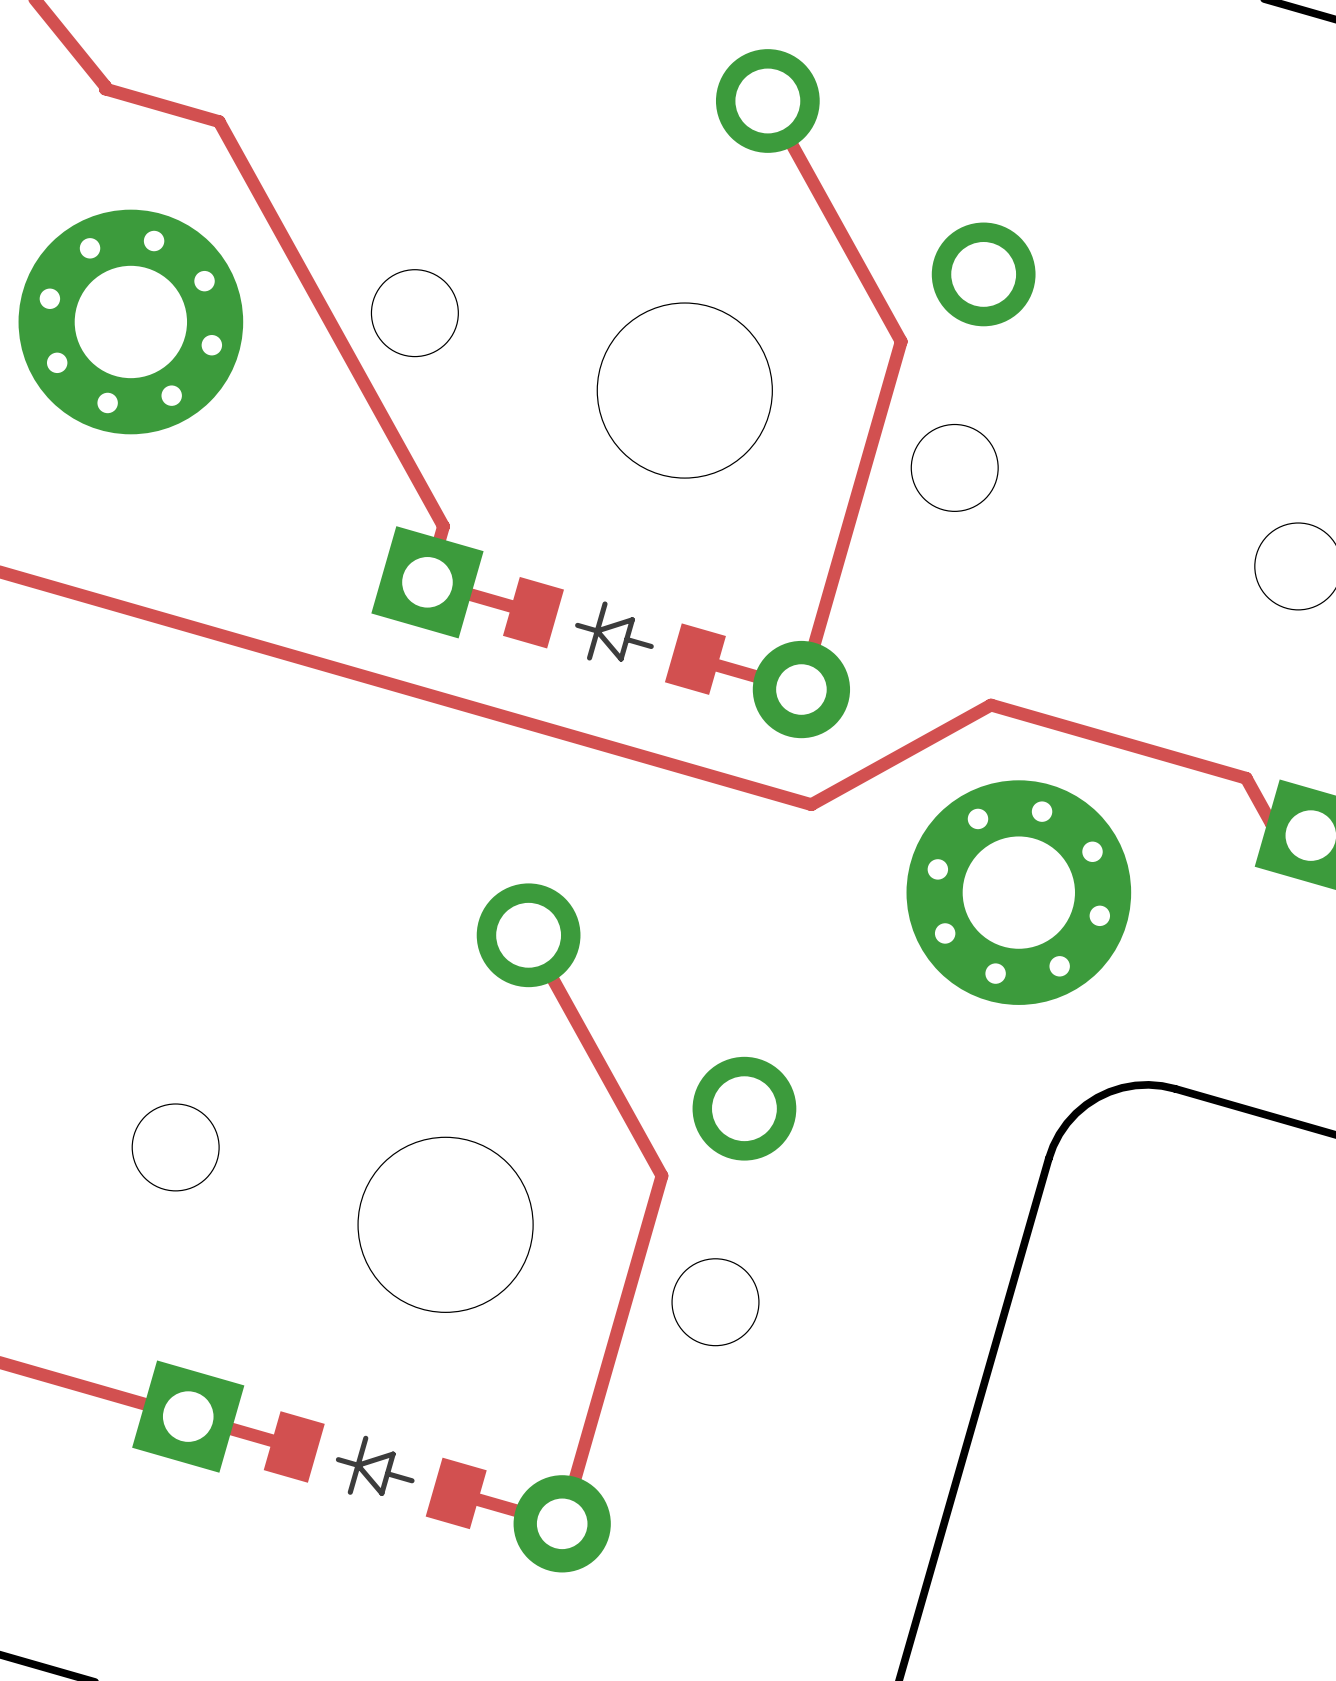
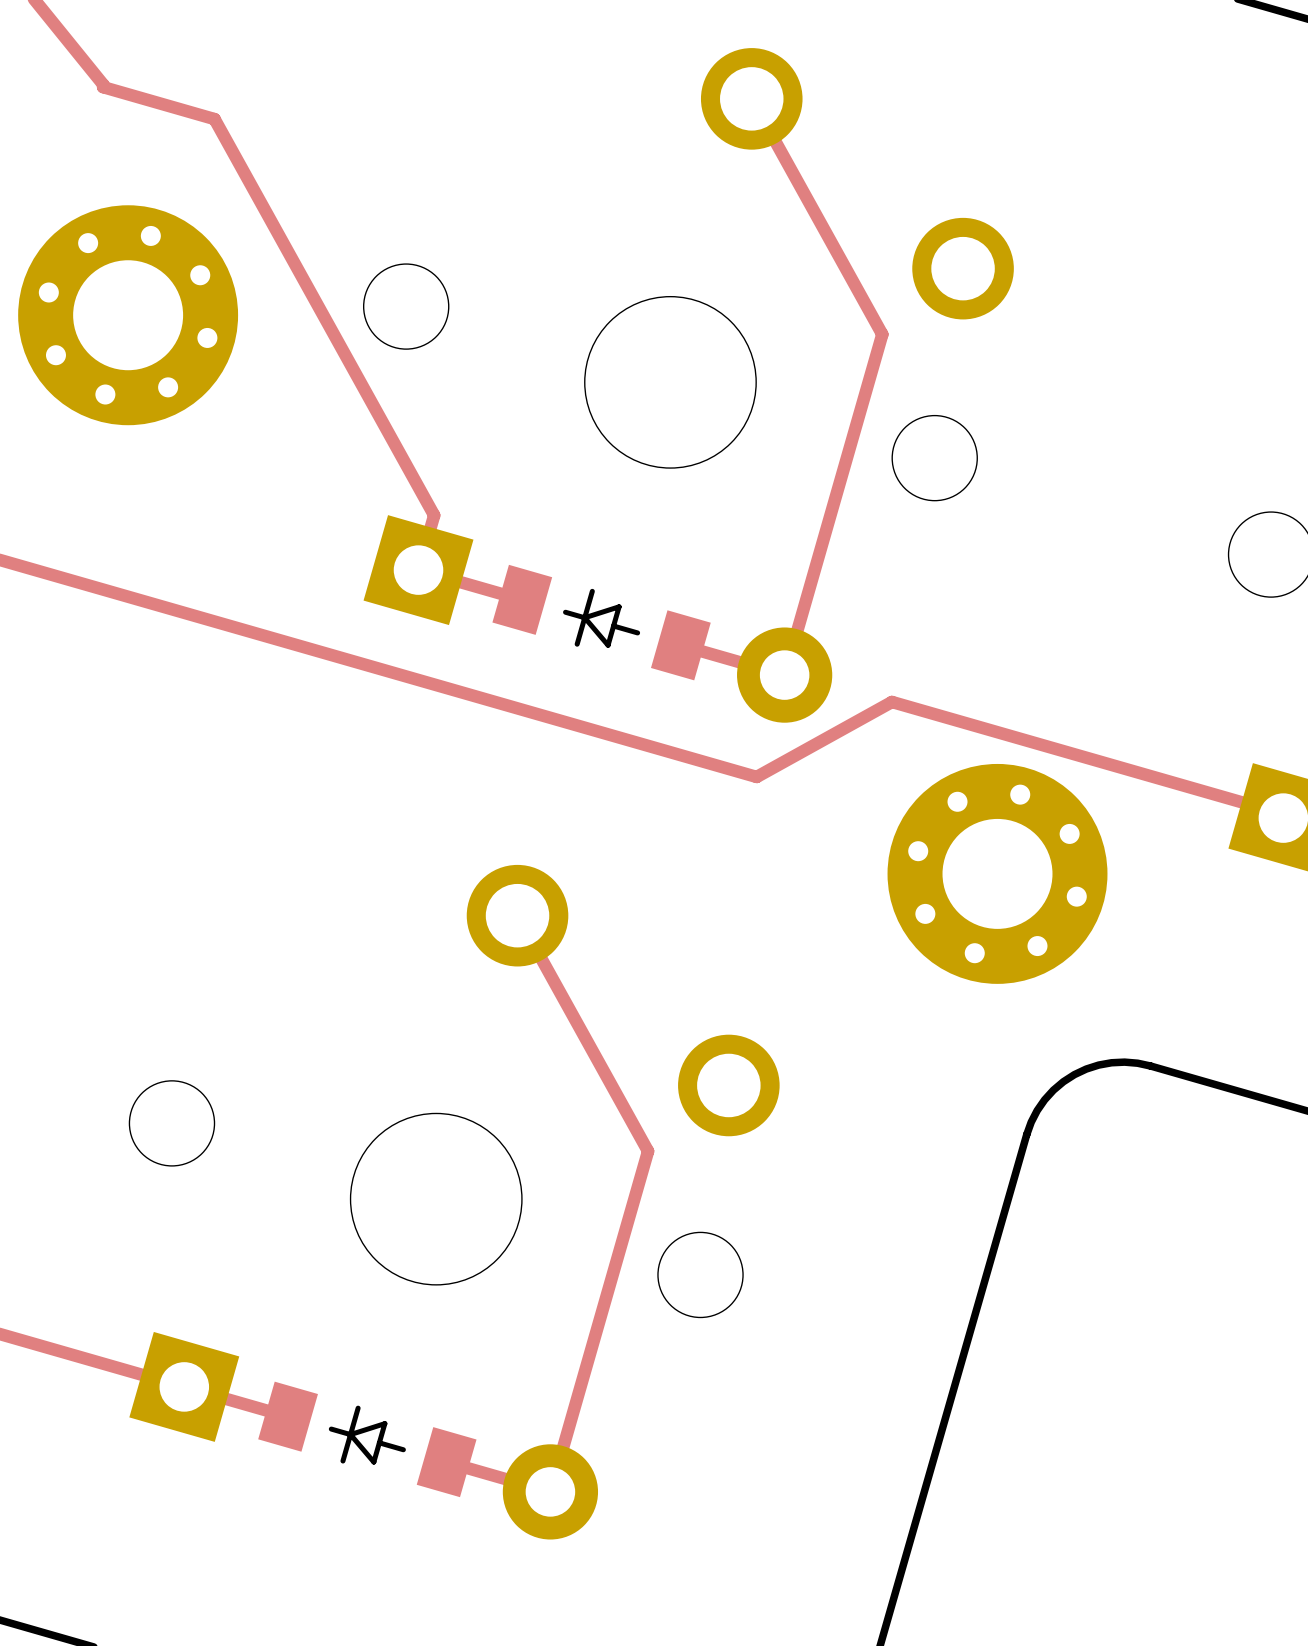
track: (772, 793) (811, 804) (991, 705) (1246, 778) (1271, 824) (1310, 835) -> (756, 776) (891, 701) (1280, 813) (1283, 818)

